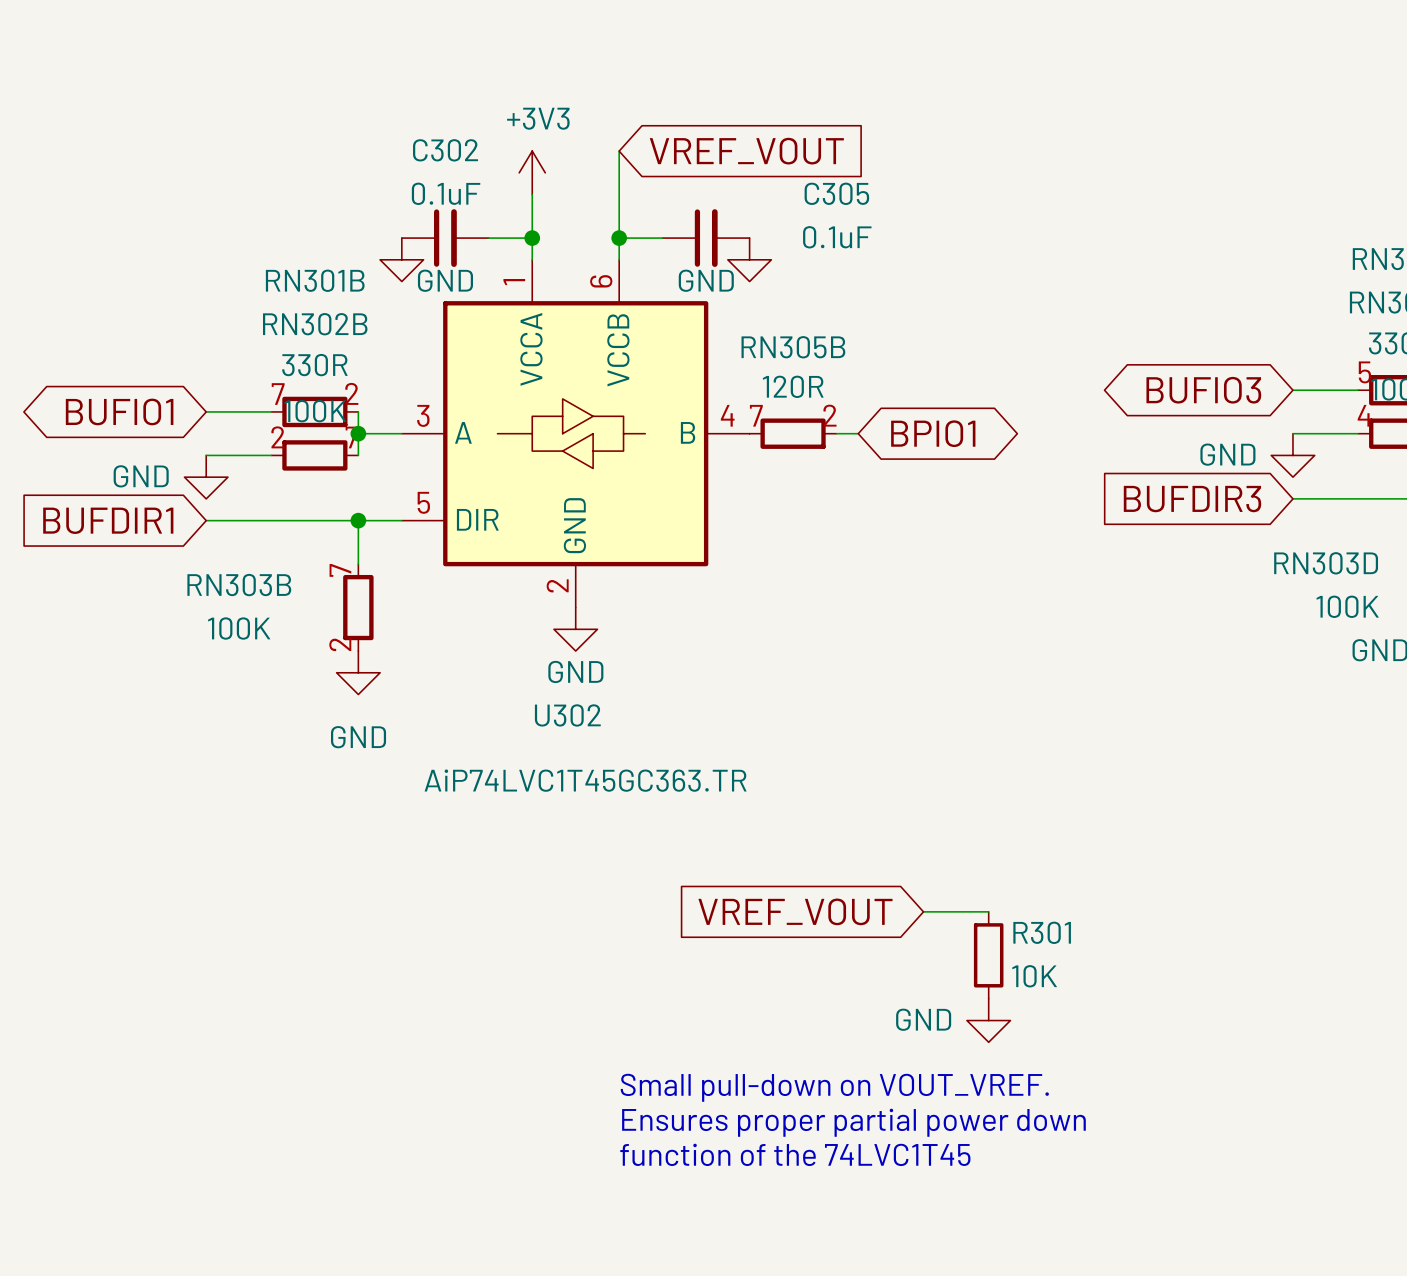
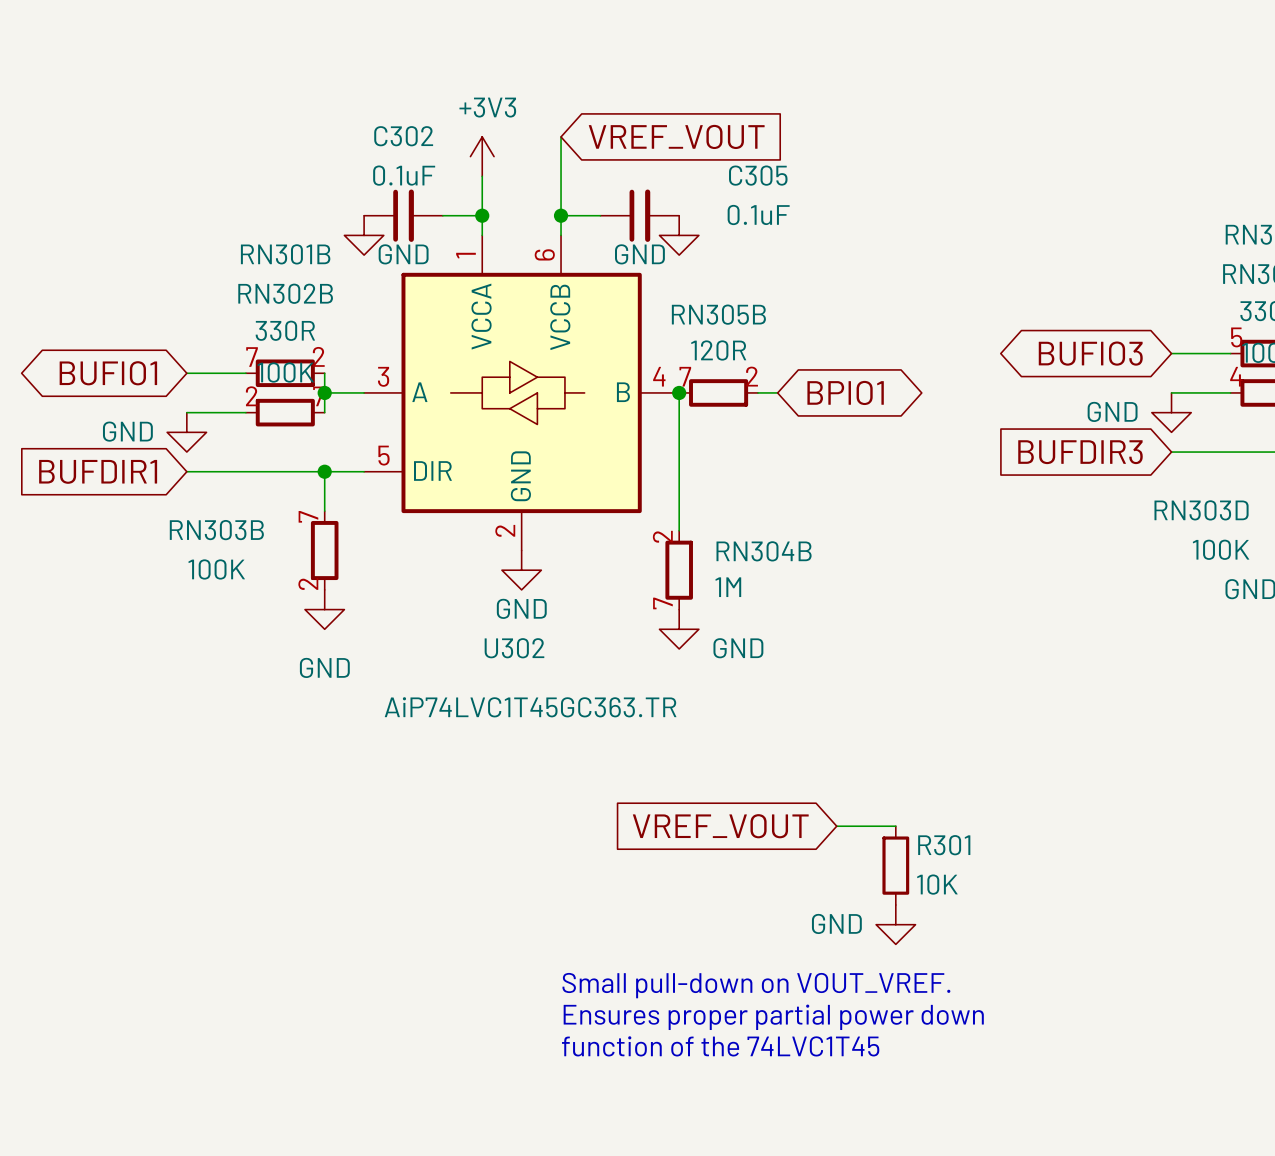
wire: none -> (679, 392) (679, 530)
junction: none -> (679, 392)
RN304B: none -> 1M (679, 570)
power symbol: none -> GND (679, 629)

